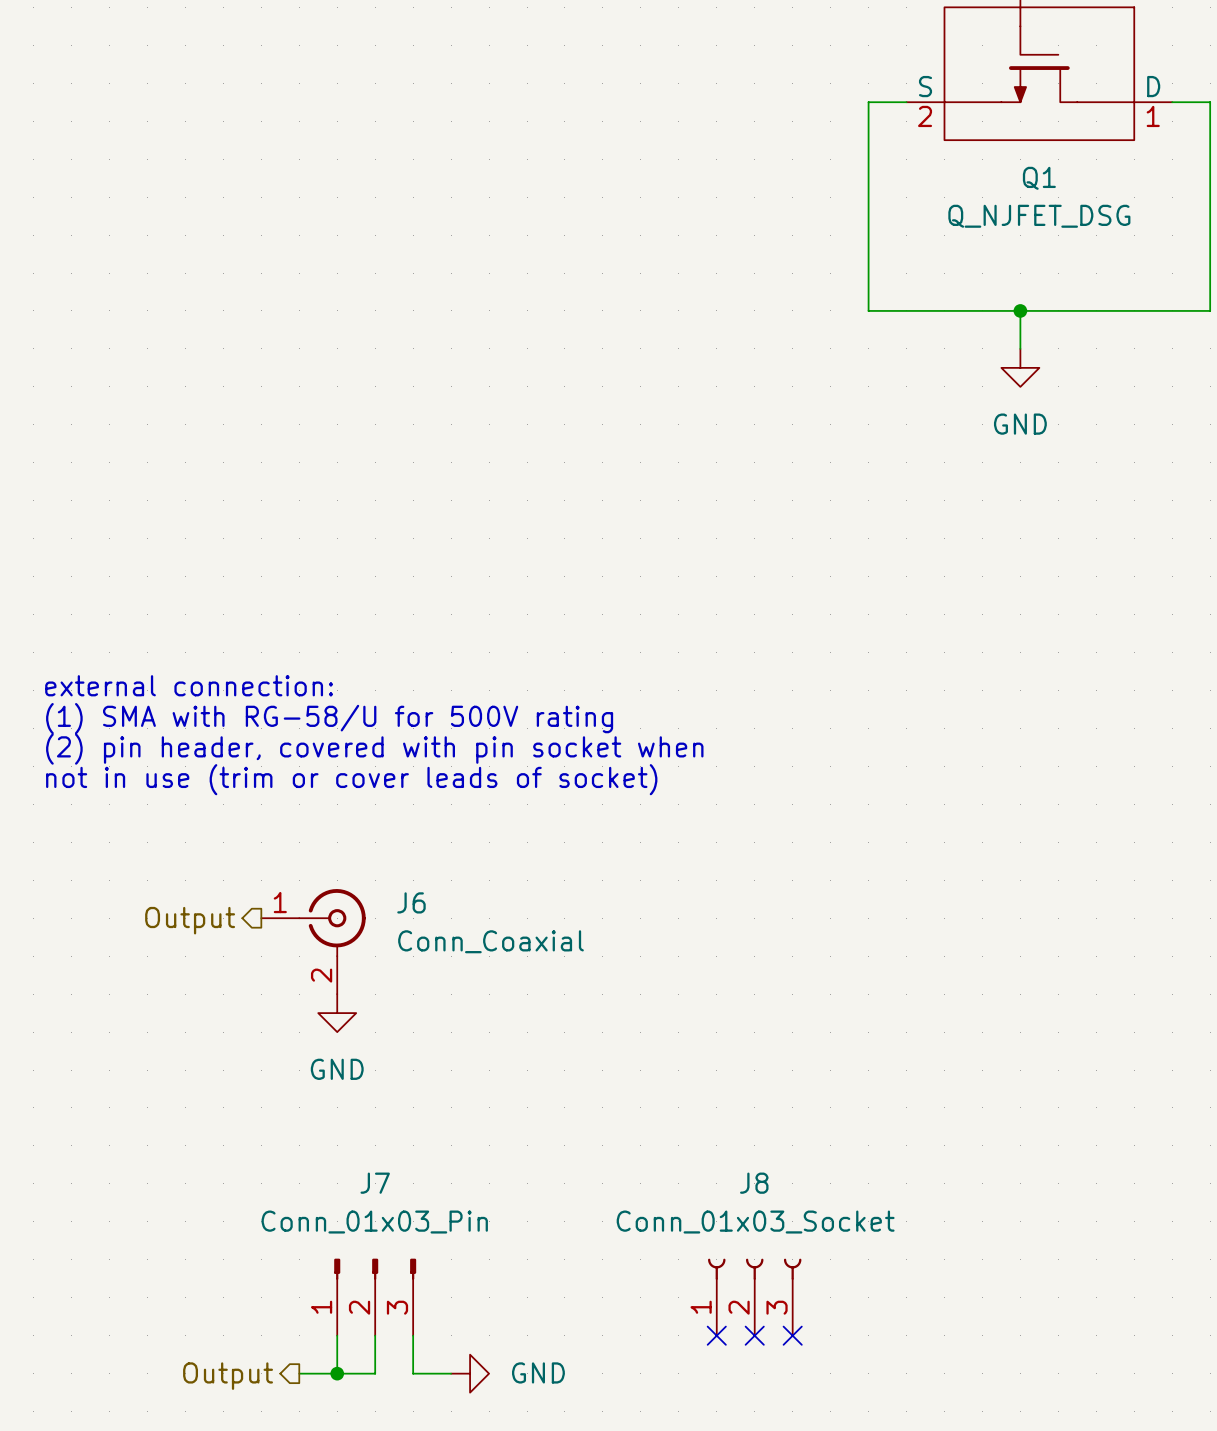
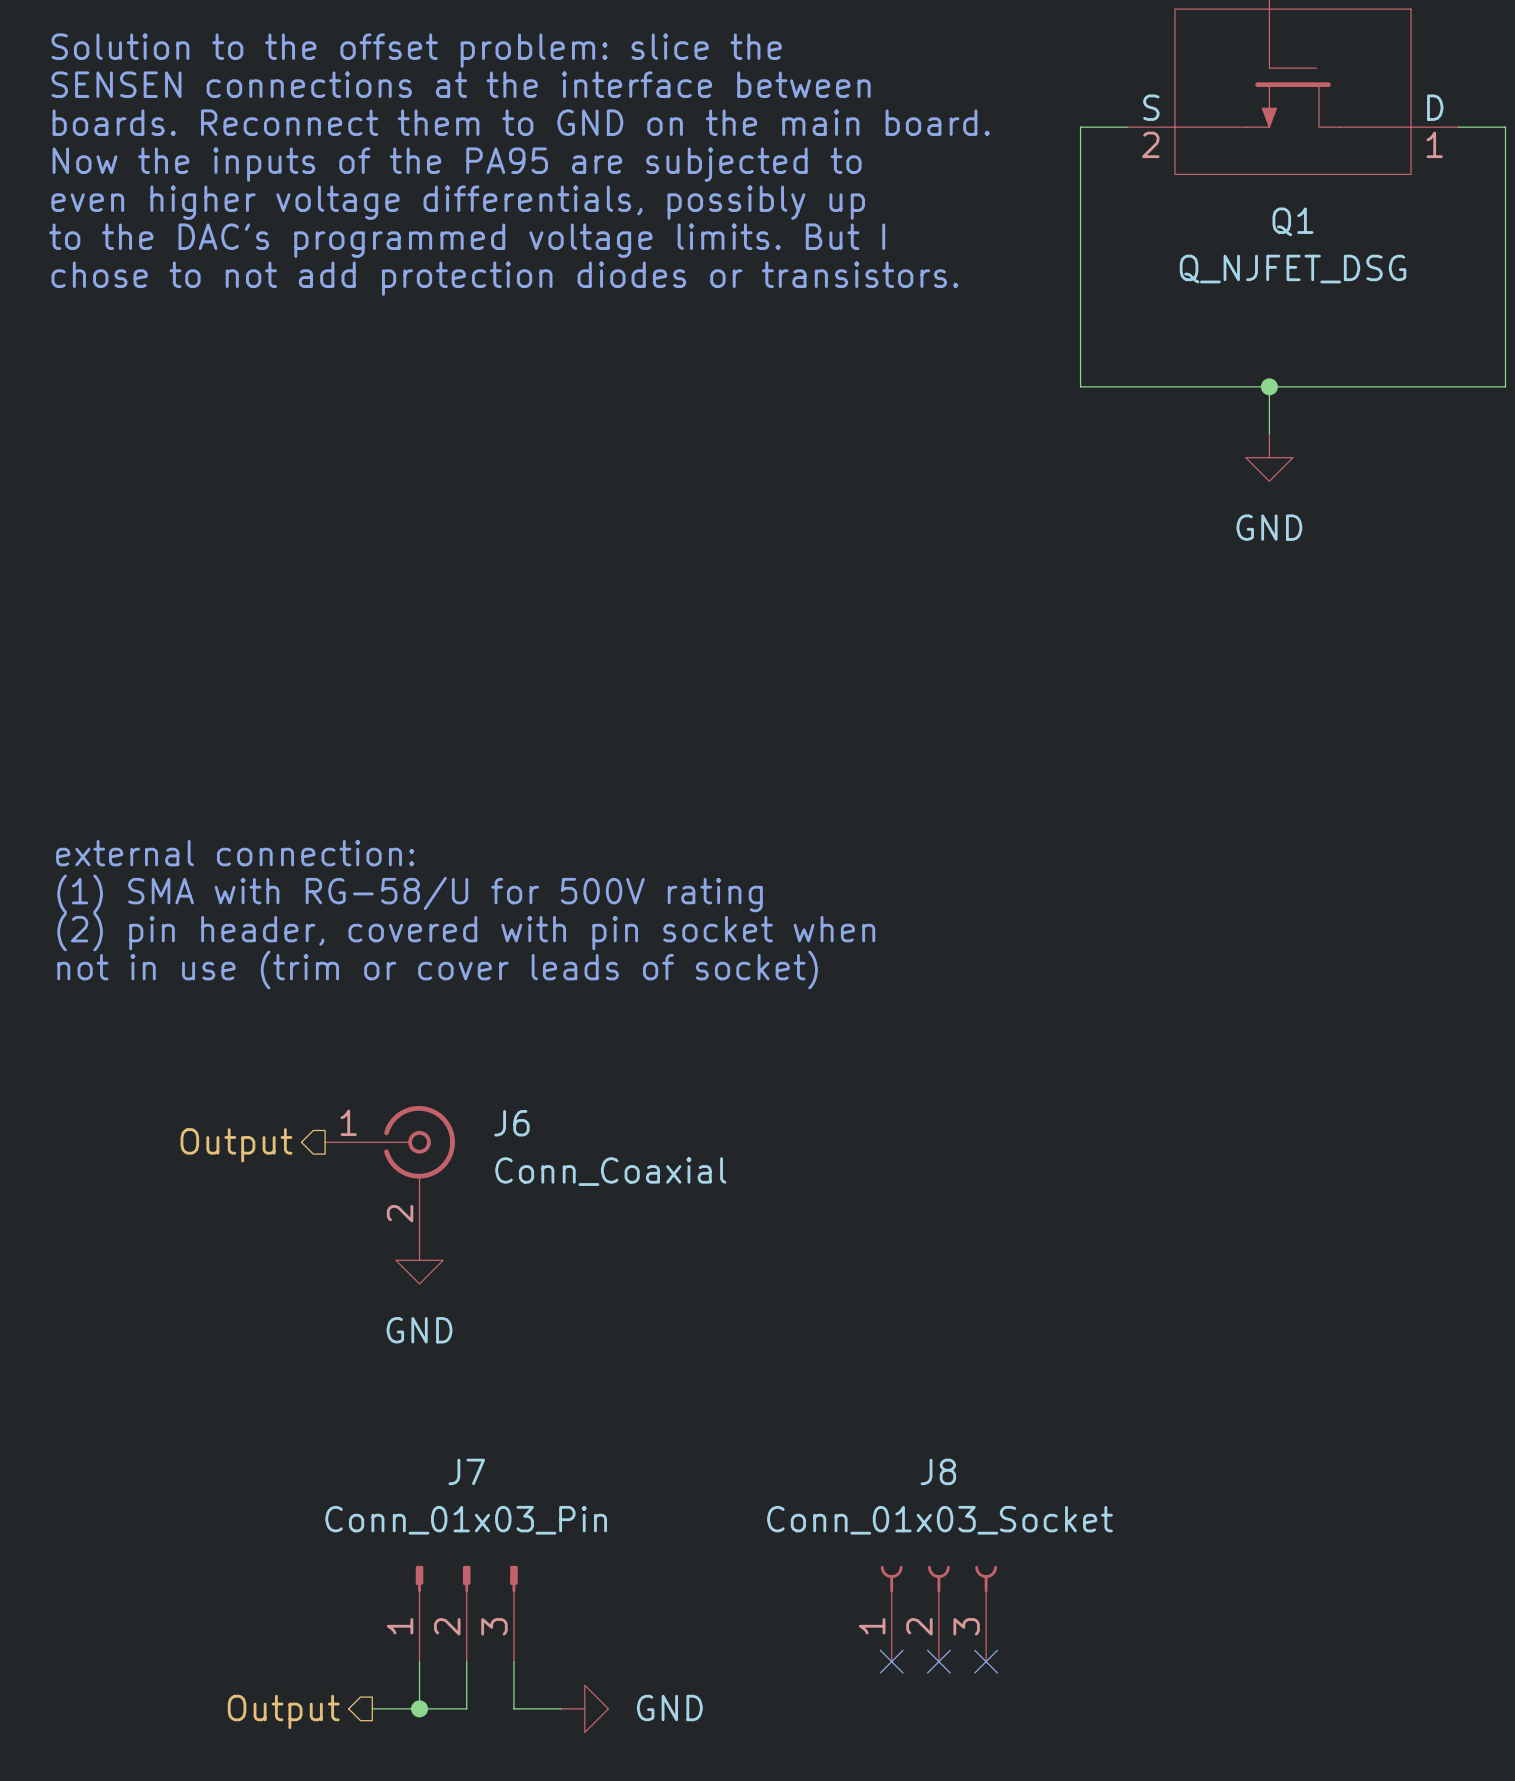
text: none -> Solution to the offset problem: slice the (416, 50)
text: none -> SENSEN connections at the interface between (461, 84)
text: none -> boards. Reconnect them to GND on the main board. (521, 122)
text: none -> Now the inputs of the PA95 are subjected to (457, 164)
text: none -> even higher voltage differentials, possibly up (458, 202)
text: none -> to the DAC's programmed voltage limits. But I (467, 240)
text: none -> chose to not add protection diodes or transistors. (504, 278)

